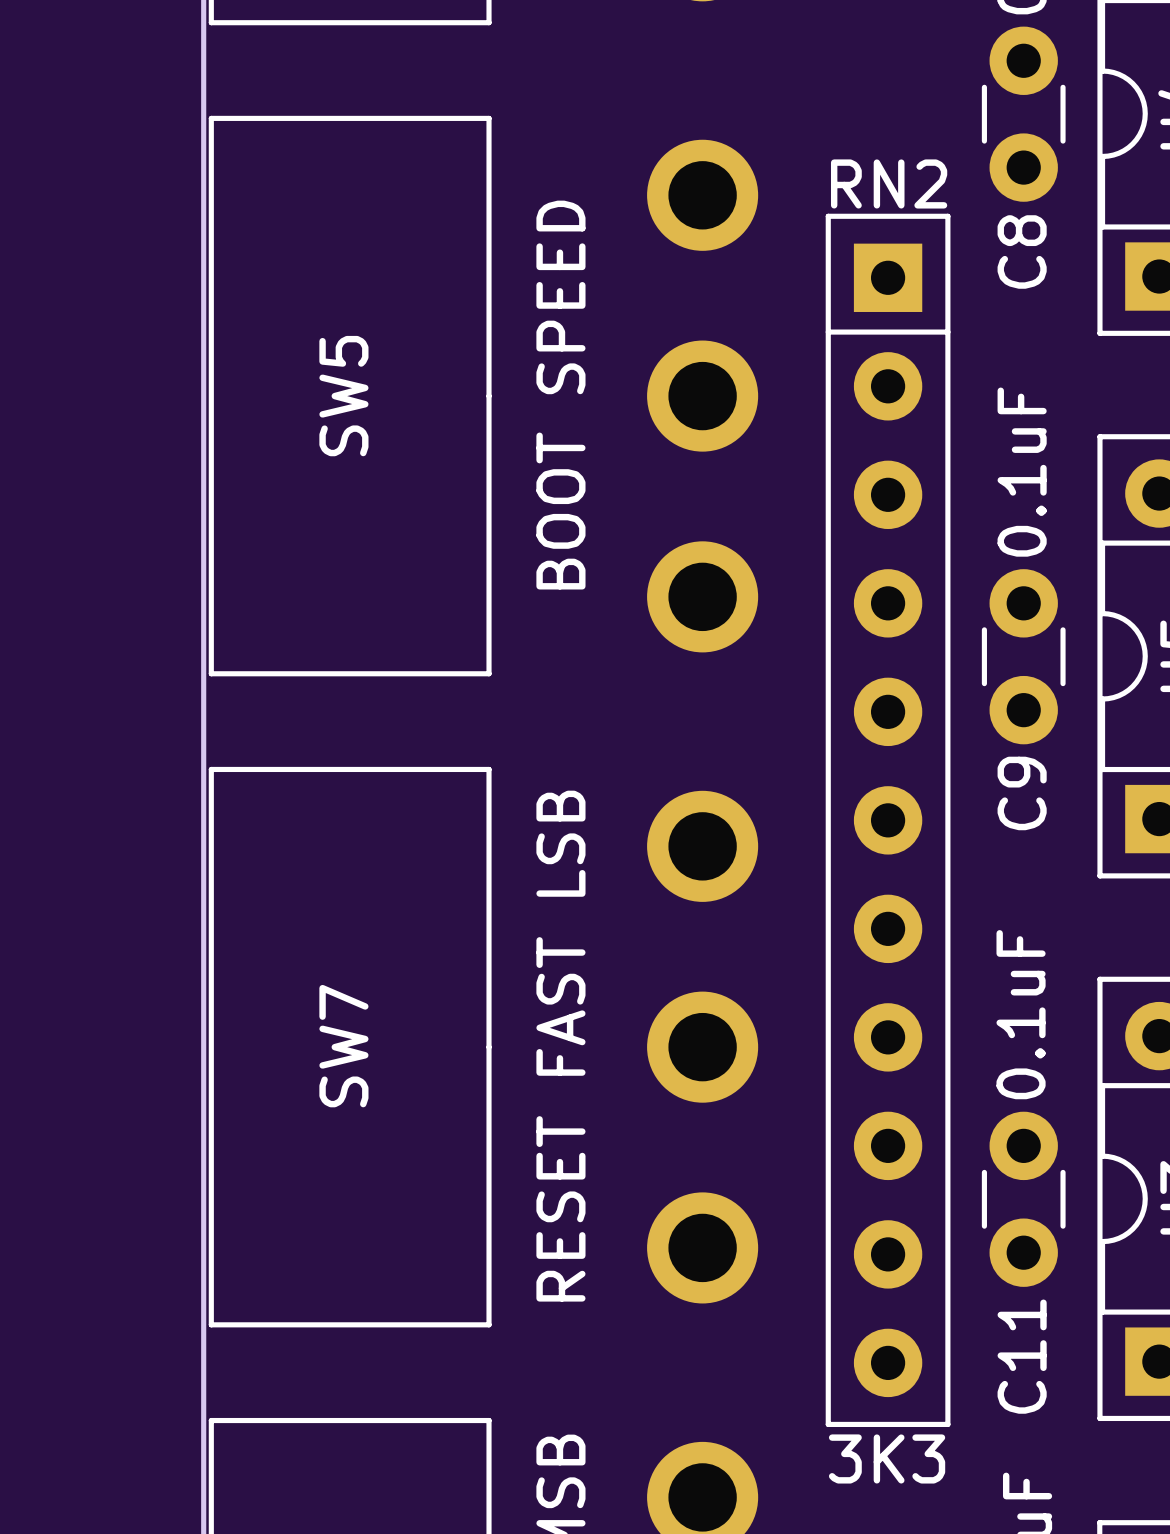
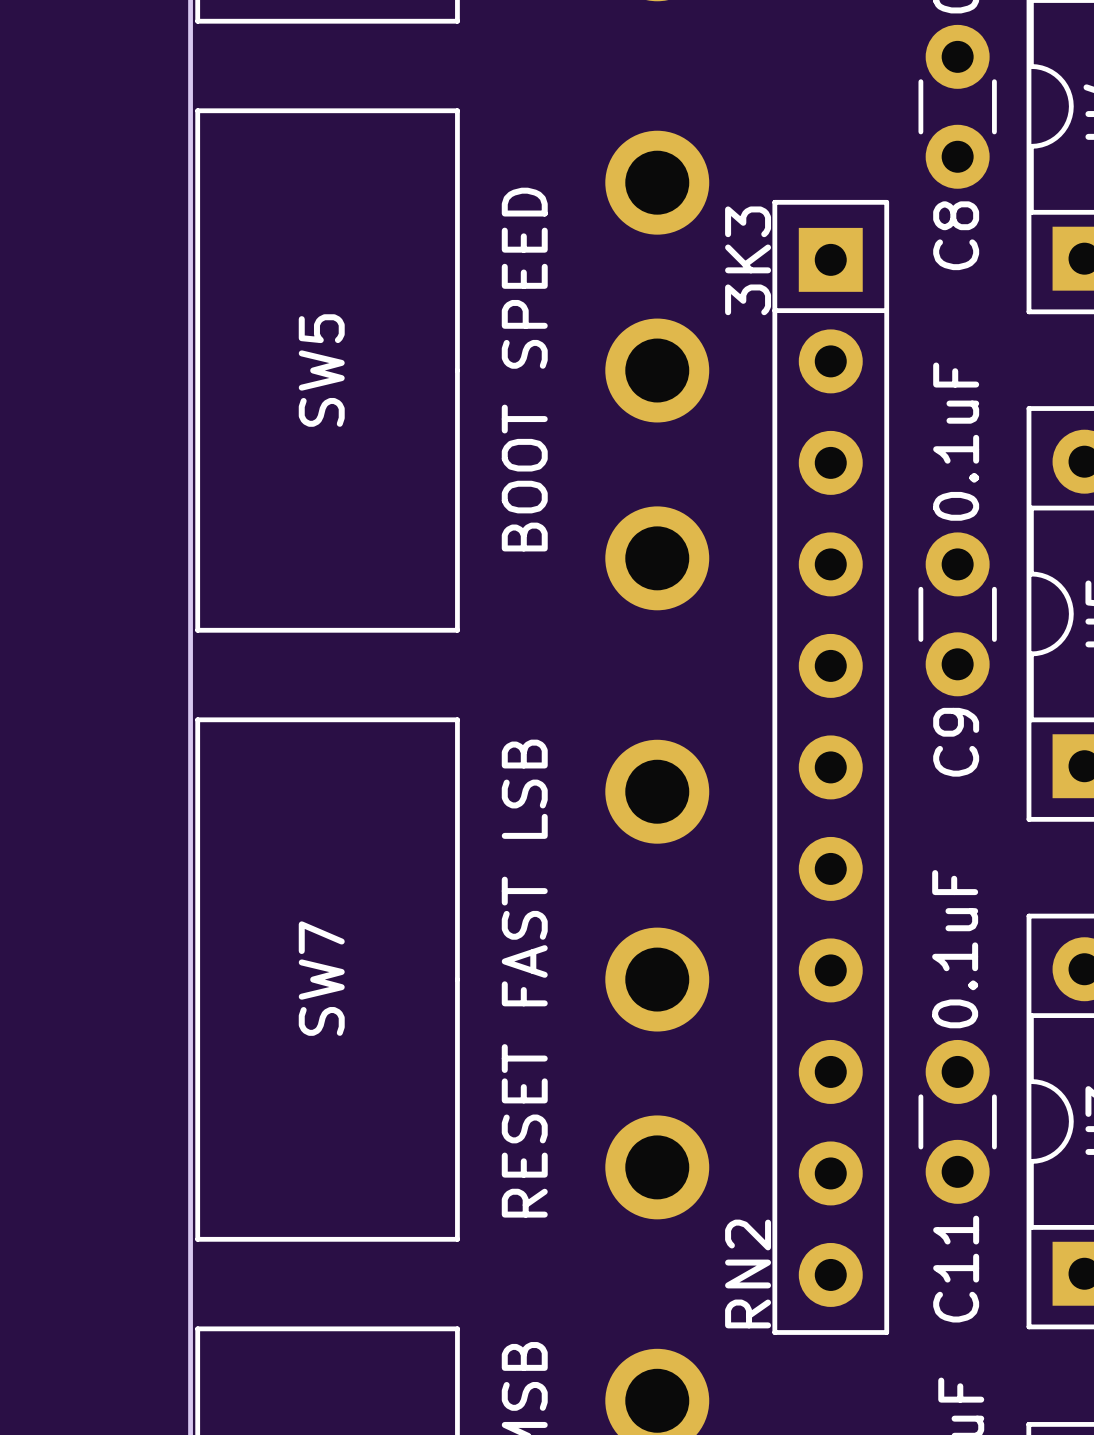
RN2 name rotation: 0° (889, 183) -> 90° counterclockwise (748, 1274)
RN2 name position: RN2 (889, 183) -> RN2 (748, 1274)
RN2 value rotation: 0° (887, 1458) -> 90° counterclockwise (748, 260)
RN2 value position: 3K3 (887, 1458) -> 3K3 (748, 260)

